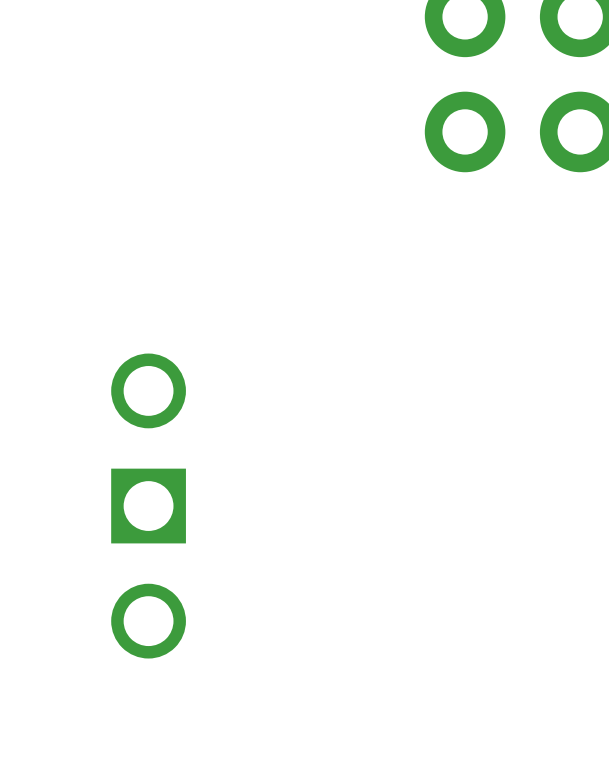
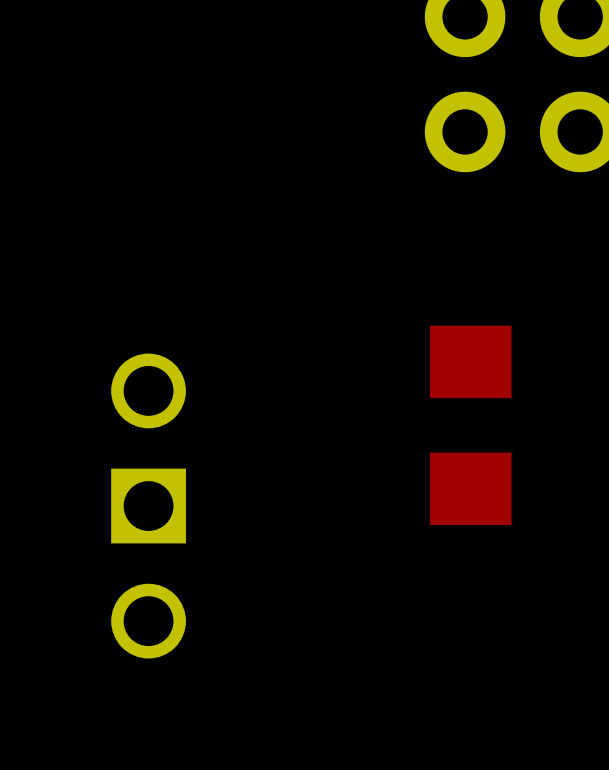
part: none -> (470, 425)

